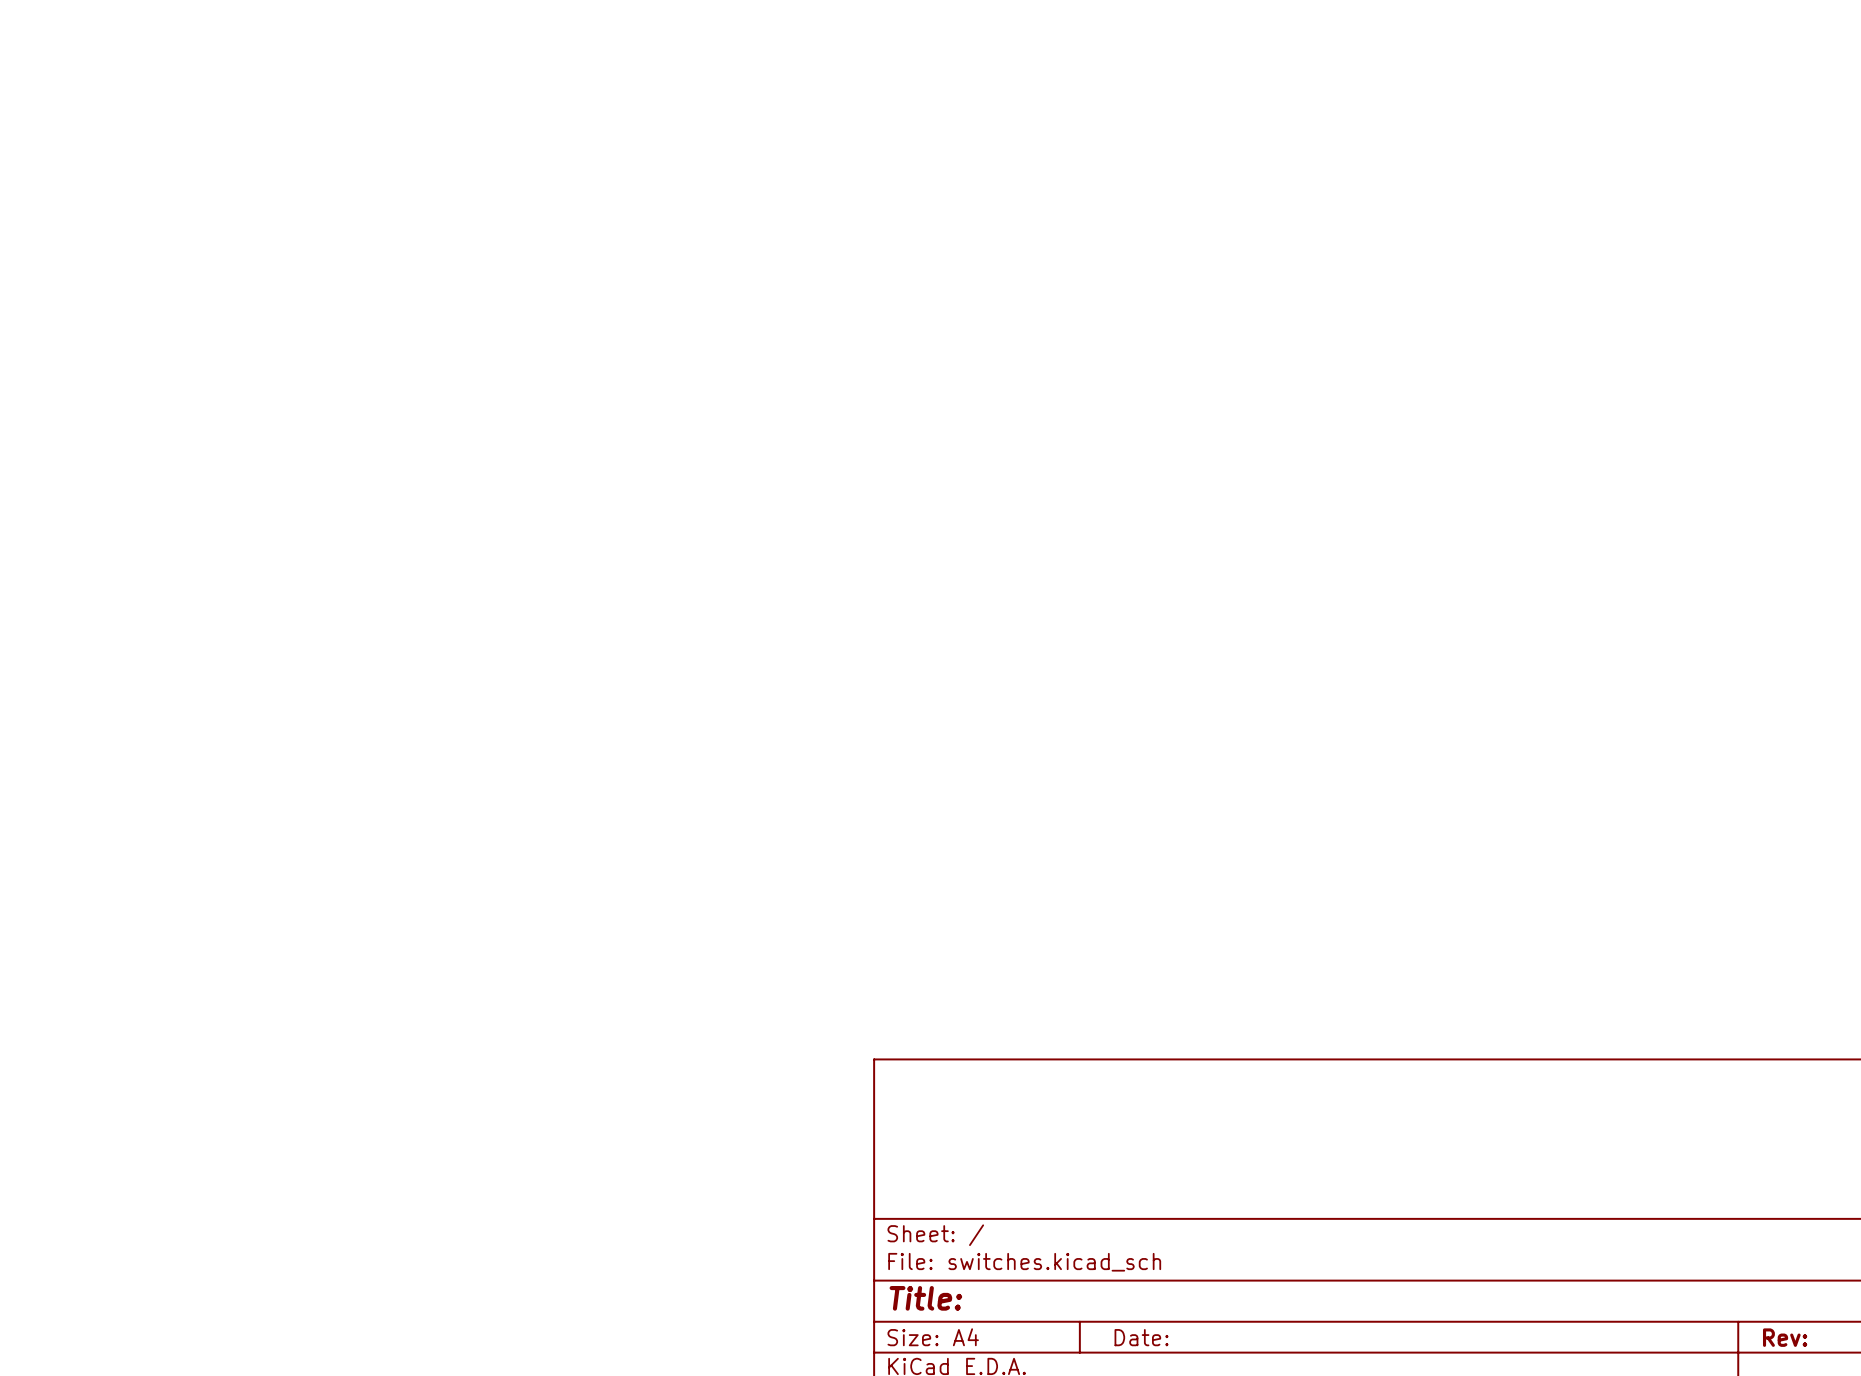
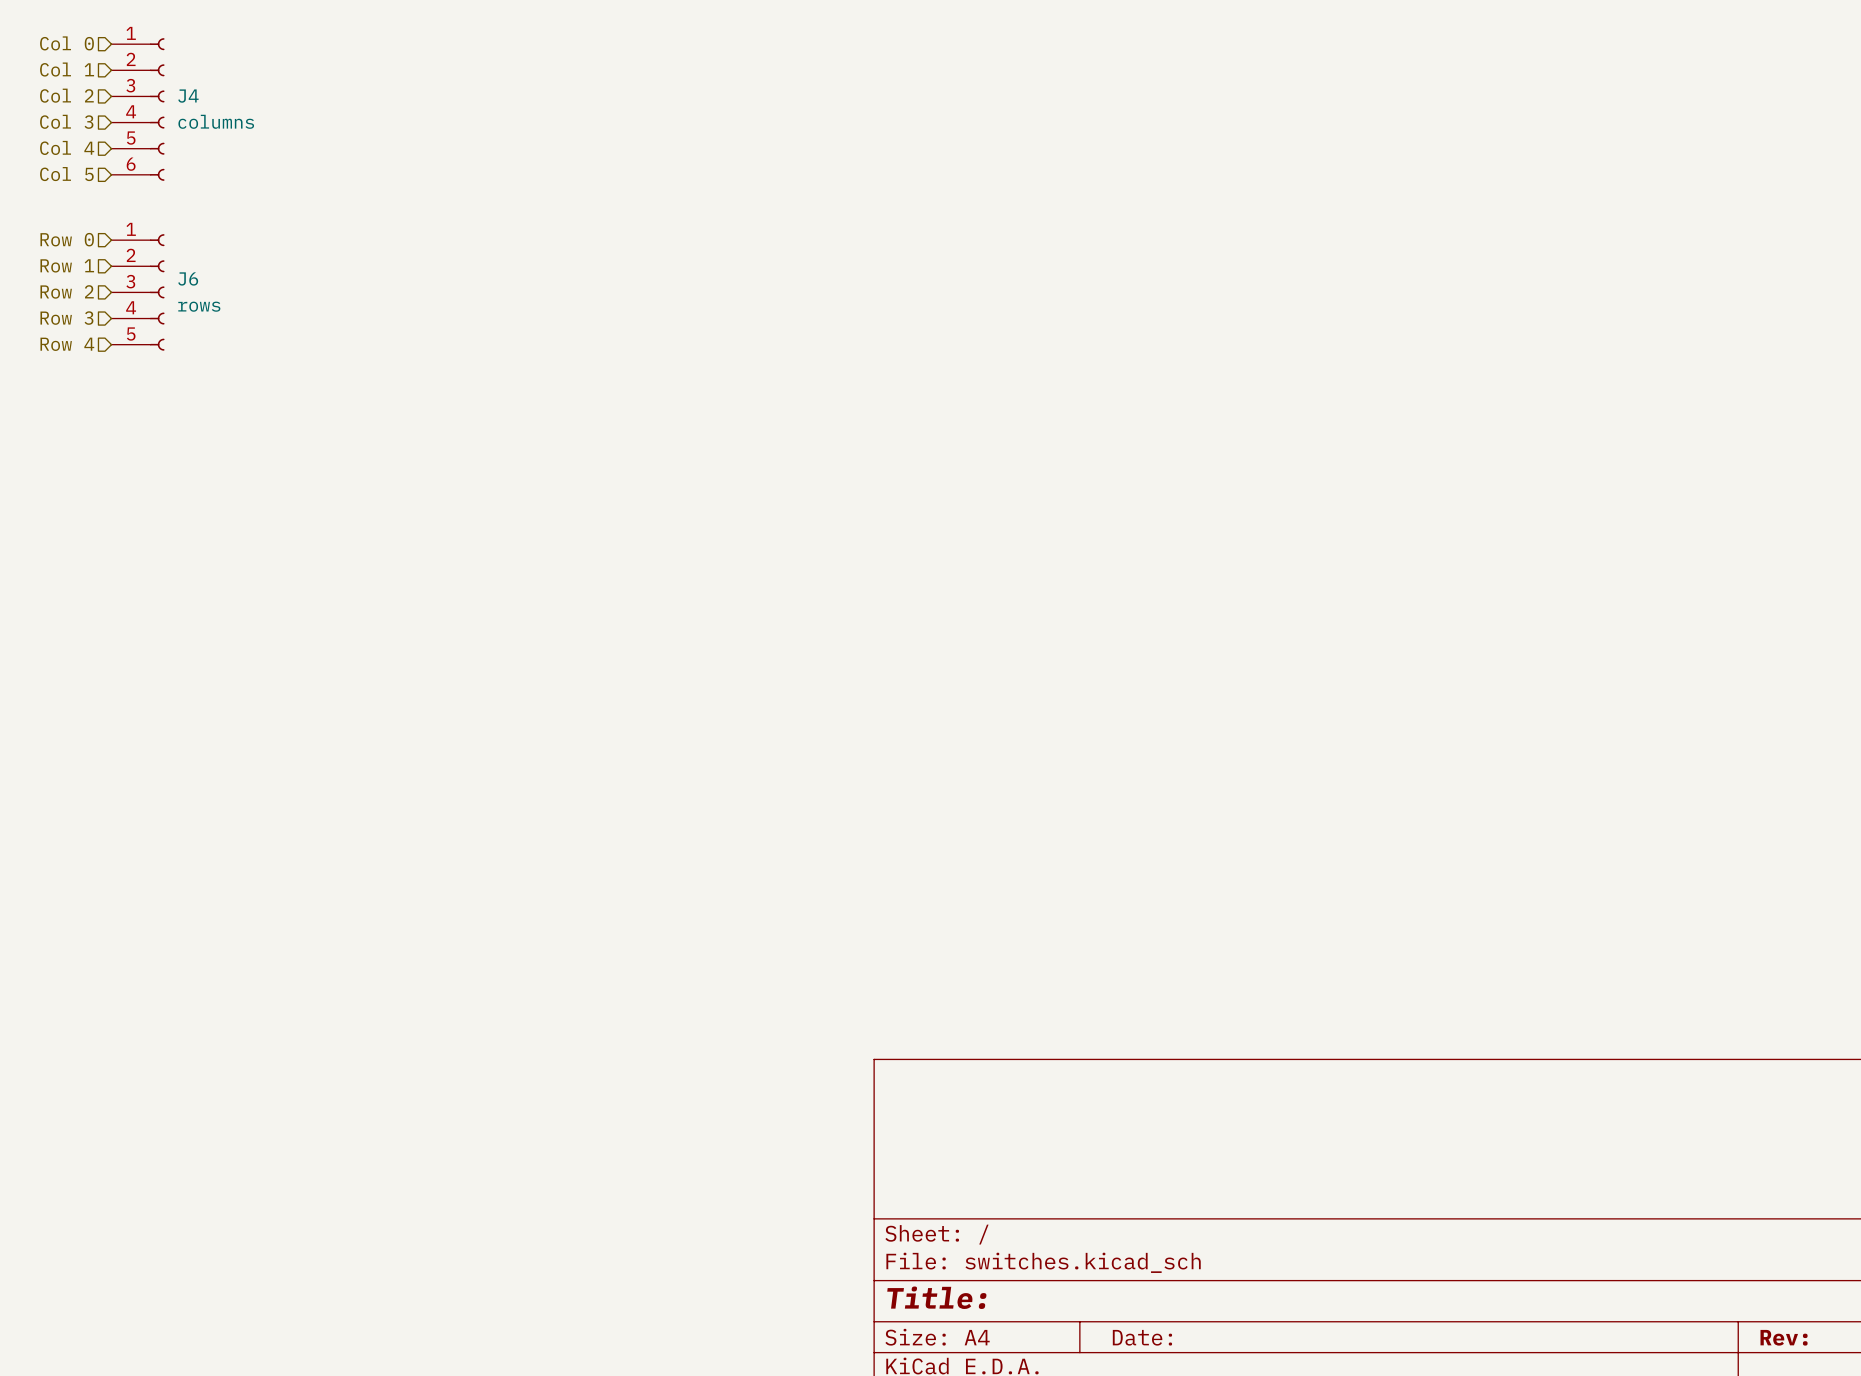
hierarchical label: none -> Col 0 (66, 43)
hierarchical label: none -> Col 1 (67, 69)
hierarchical label: none -> Col 2 (66, 95)
J4: none -> columns (138, 109)
hierarchical label: none -> Col 3 (66, 121)
hierarchical label: none -> Col 4 (67, 147)
hierarchical label: none -> Col 5 (66, 174)
hierarchical label: none -> Row 0 (67, 239)
hierarchical label: none -> Row 1 (67, 265)
hierarchical label: none -> Row 2 (67, 291)
J6: none -> rows (138, 292)
hierarchical label: none -> Row 3 (66, 318)
hierarchical label: none -> Row 4 (67, 344)

